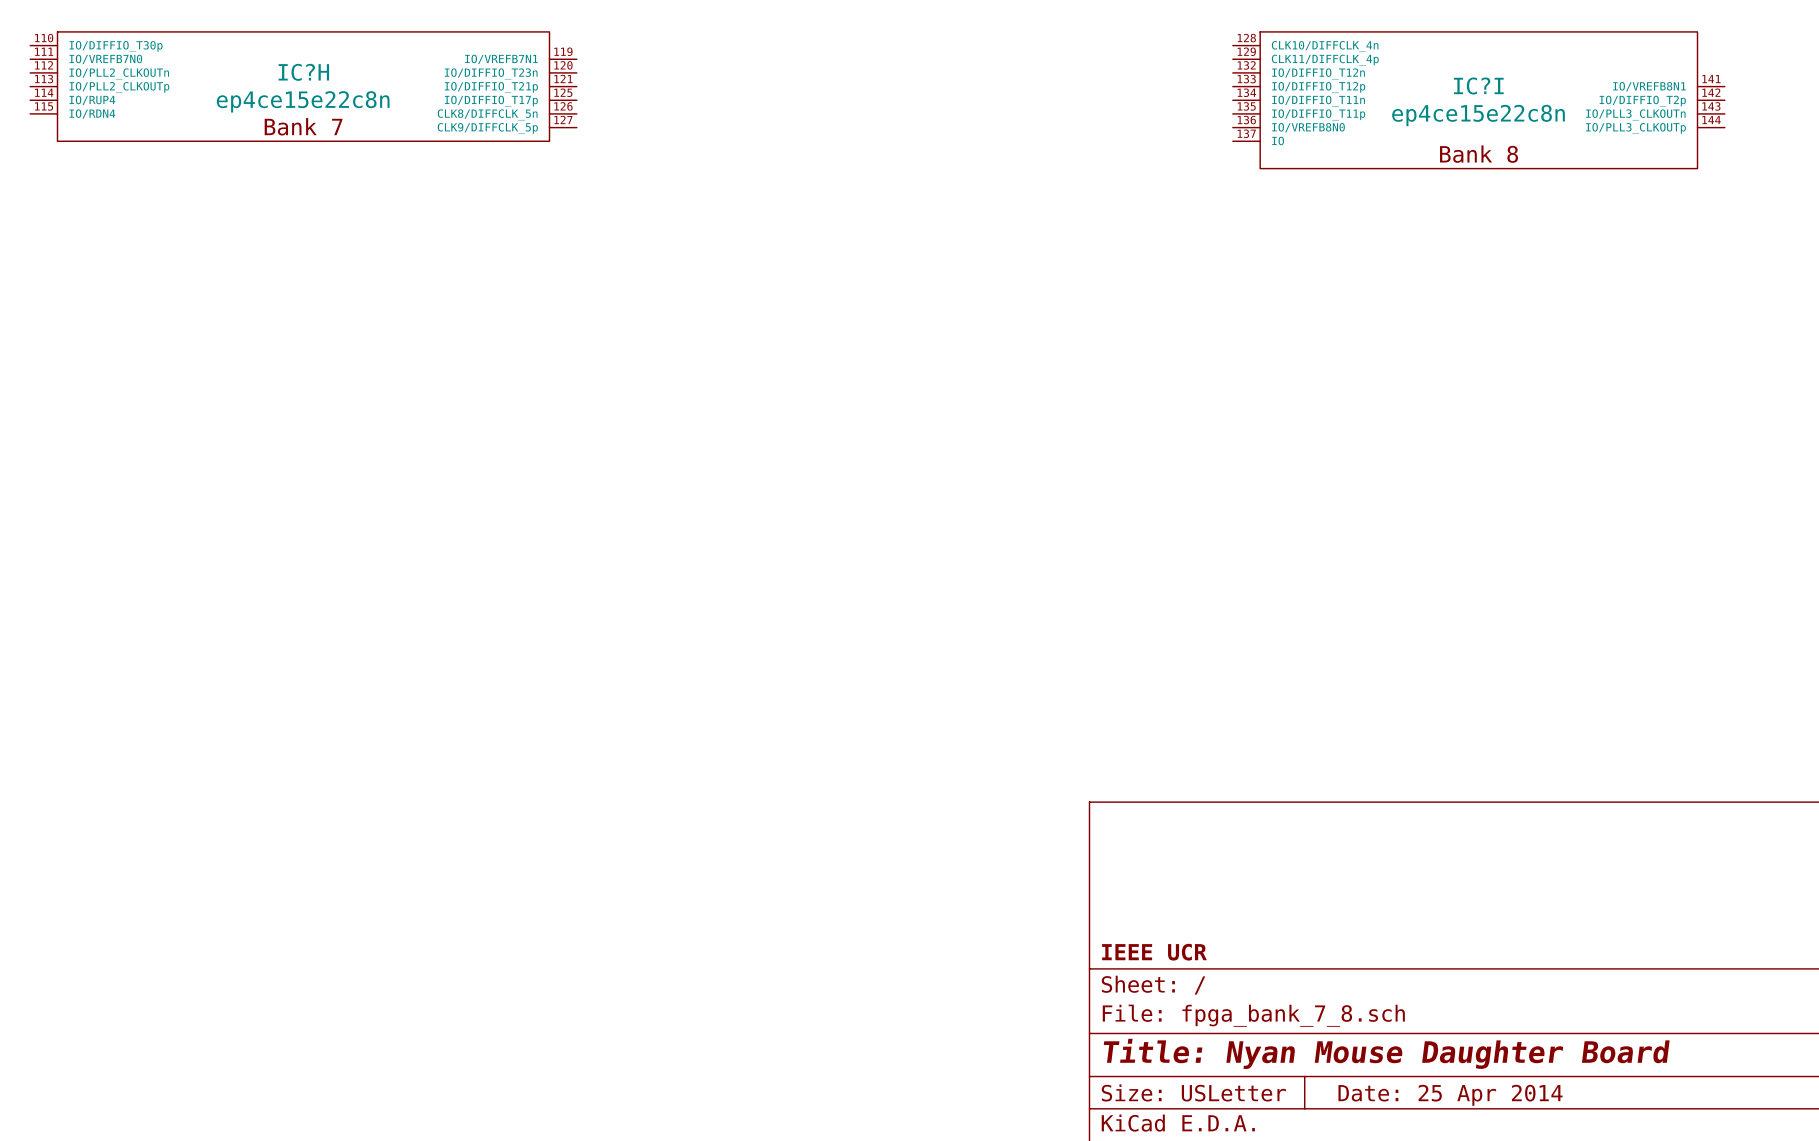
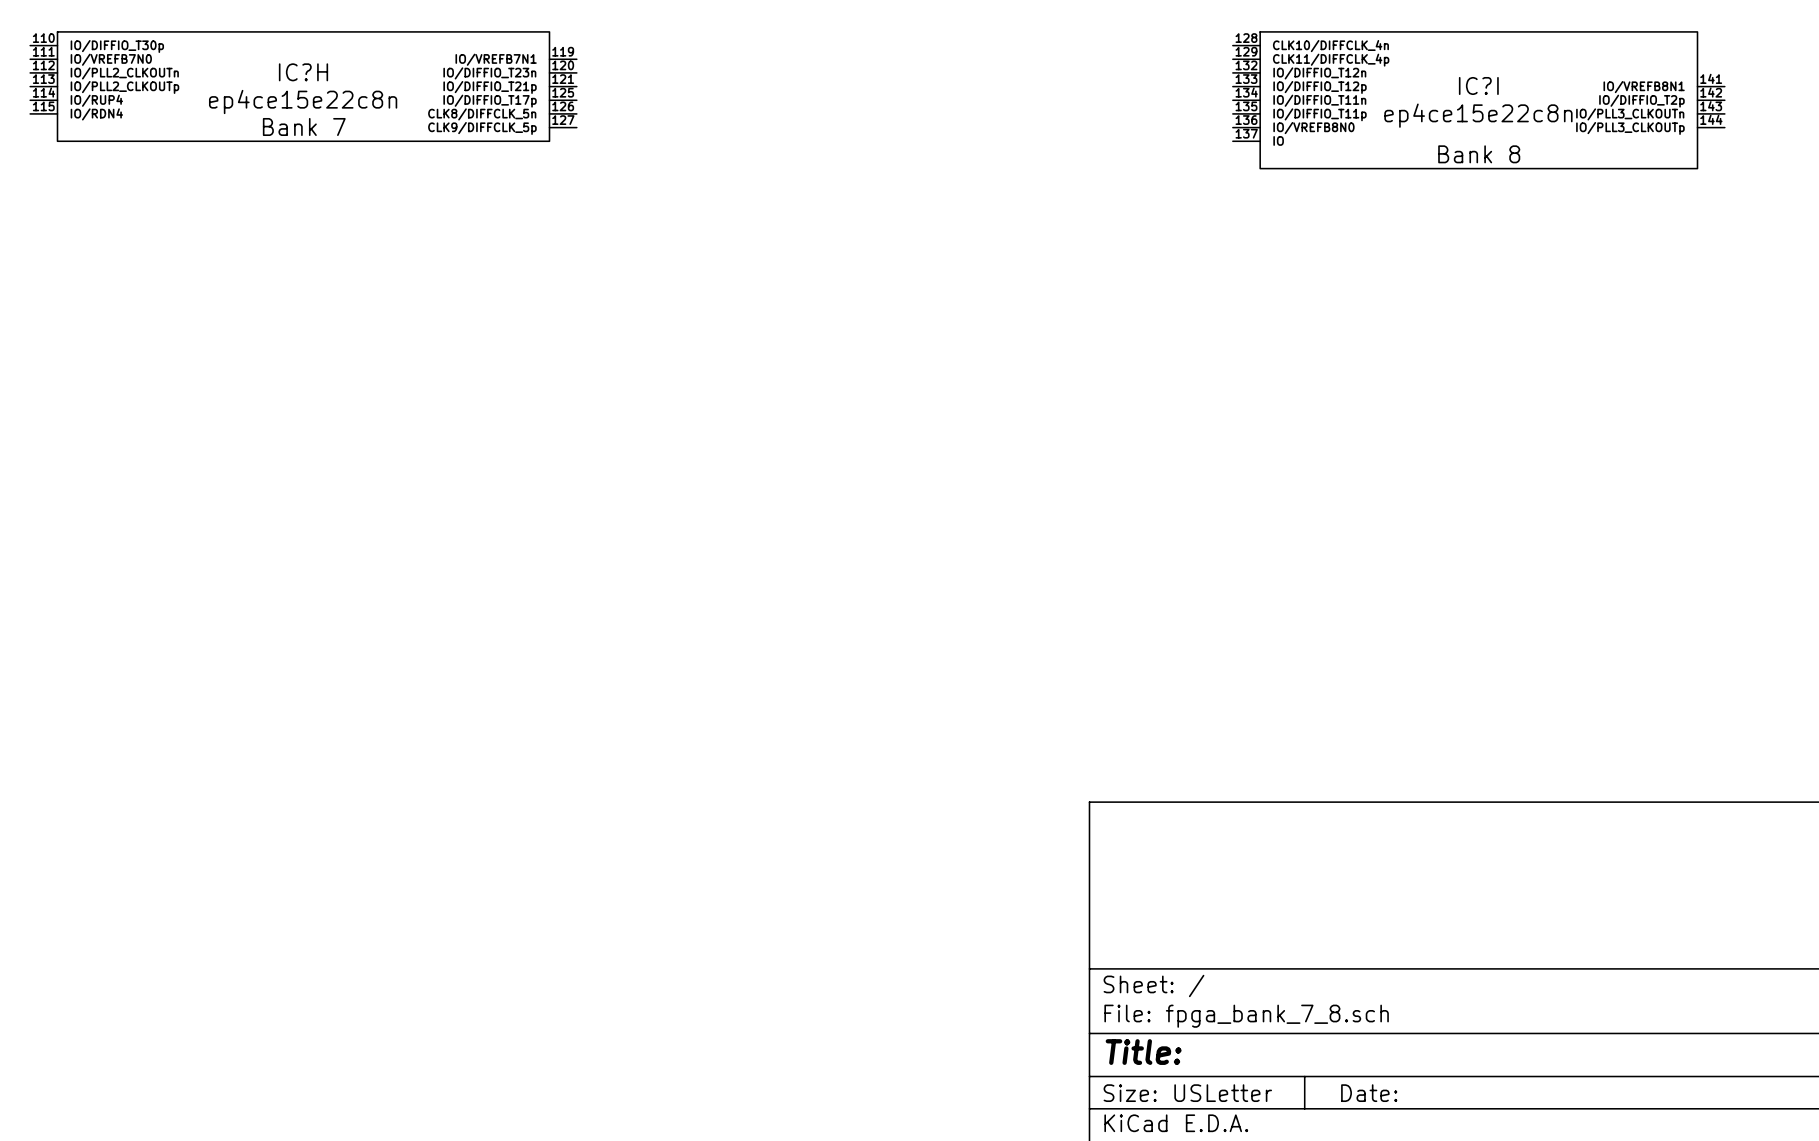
title block: IEEE UCR (1154, 952) -> none
title block: Title: Nyan Mouse Daughter Board (1386, 1053) -> Title: (1143, 1052)
title block: Date: 25 Apr 2014 (1450, 1095) -> Date: (1369, 1093)

